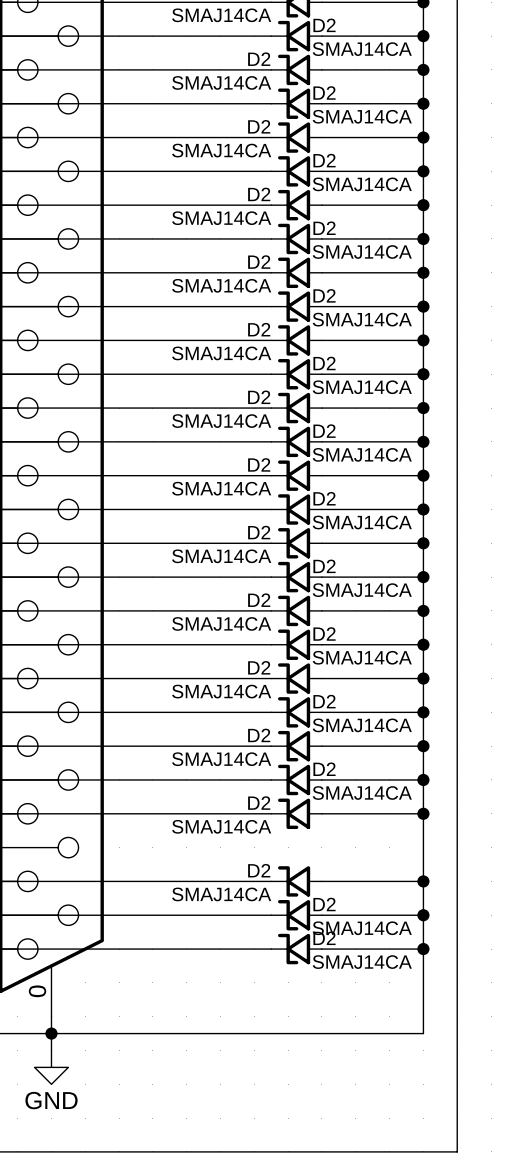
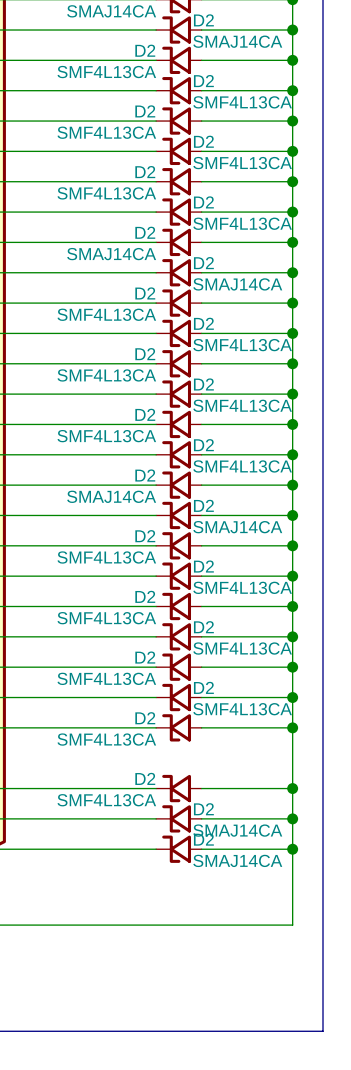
D2 value: SMAJ14CA (221, 82) -> SMF4L13CA (106, 72)
D2 value: SMAJ14CA (362, 116) -> SMF4L13CA (242, 102)
D2 value: SMAJ14CA (221, 150) -> SMF4L13CA (106, 132)
D2 value: SMAJ14CA (362, 184) -> SMF4L13CA (242, 163)
D2 value: SMAJ14CA (221, 218) -> SMF4L13CA (106, 193)
D2 value: SMAJ14CA (362, 252) -> SMF4L13CA (242, 223)
D2 value: SMAJ14CA (221, 353) -> SMF4L13CA (106, 314)
D2 value: SMAJ14CA (362, 387) -> SMF4L13CA (242, 345)
D2 value: SMAJ14CA (221, 421) -> SMF4L13CA (106, 375)
D2 value: SMAJ14CA (362, 454) -> SMF4L13CA (242, 405)
D2 value: SMAJ14CA (221, 488) -> SMF4L13CA (106, 436)
D2 value: SMAJ14CA (362, 522) -> SMF4L13CA (242, 466)
D2 value: SMAJ14CA (221, 623) -> SMF4L13CA (106, 557)
D2 value: SMAJ14CA (362, 657) -> SMF4L13CA (242, 587)
D2 value: SMAJ14CA (221, 691) -> SMF4L13CA (106, 618)
D2 value: SMAJ14CA (362, 725) -> SMF4L13CA (242, 648)
D2 value: SMAJ14CA (221, 759) -> SMF4L13CA (106, 678)
D2 value: SMAJ14CA (362, 793) -> SMF4L13CA (242, 709)
D2 value: SMAJ14CA (221, 826) -> SMF4L13CA (106, 739)
D2 value: SMAJ14CA (221, 894) -> SMF4L13CA (106, 800)

